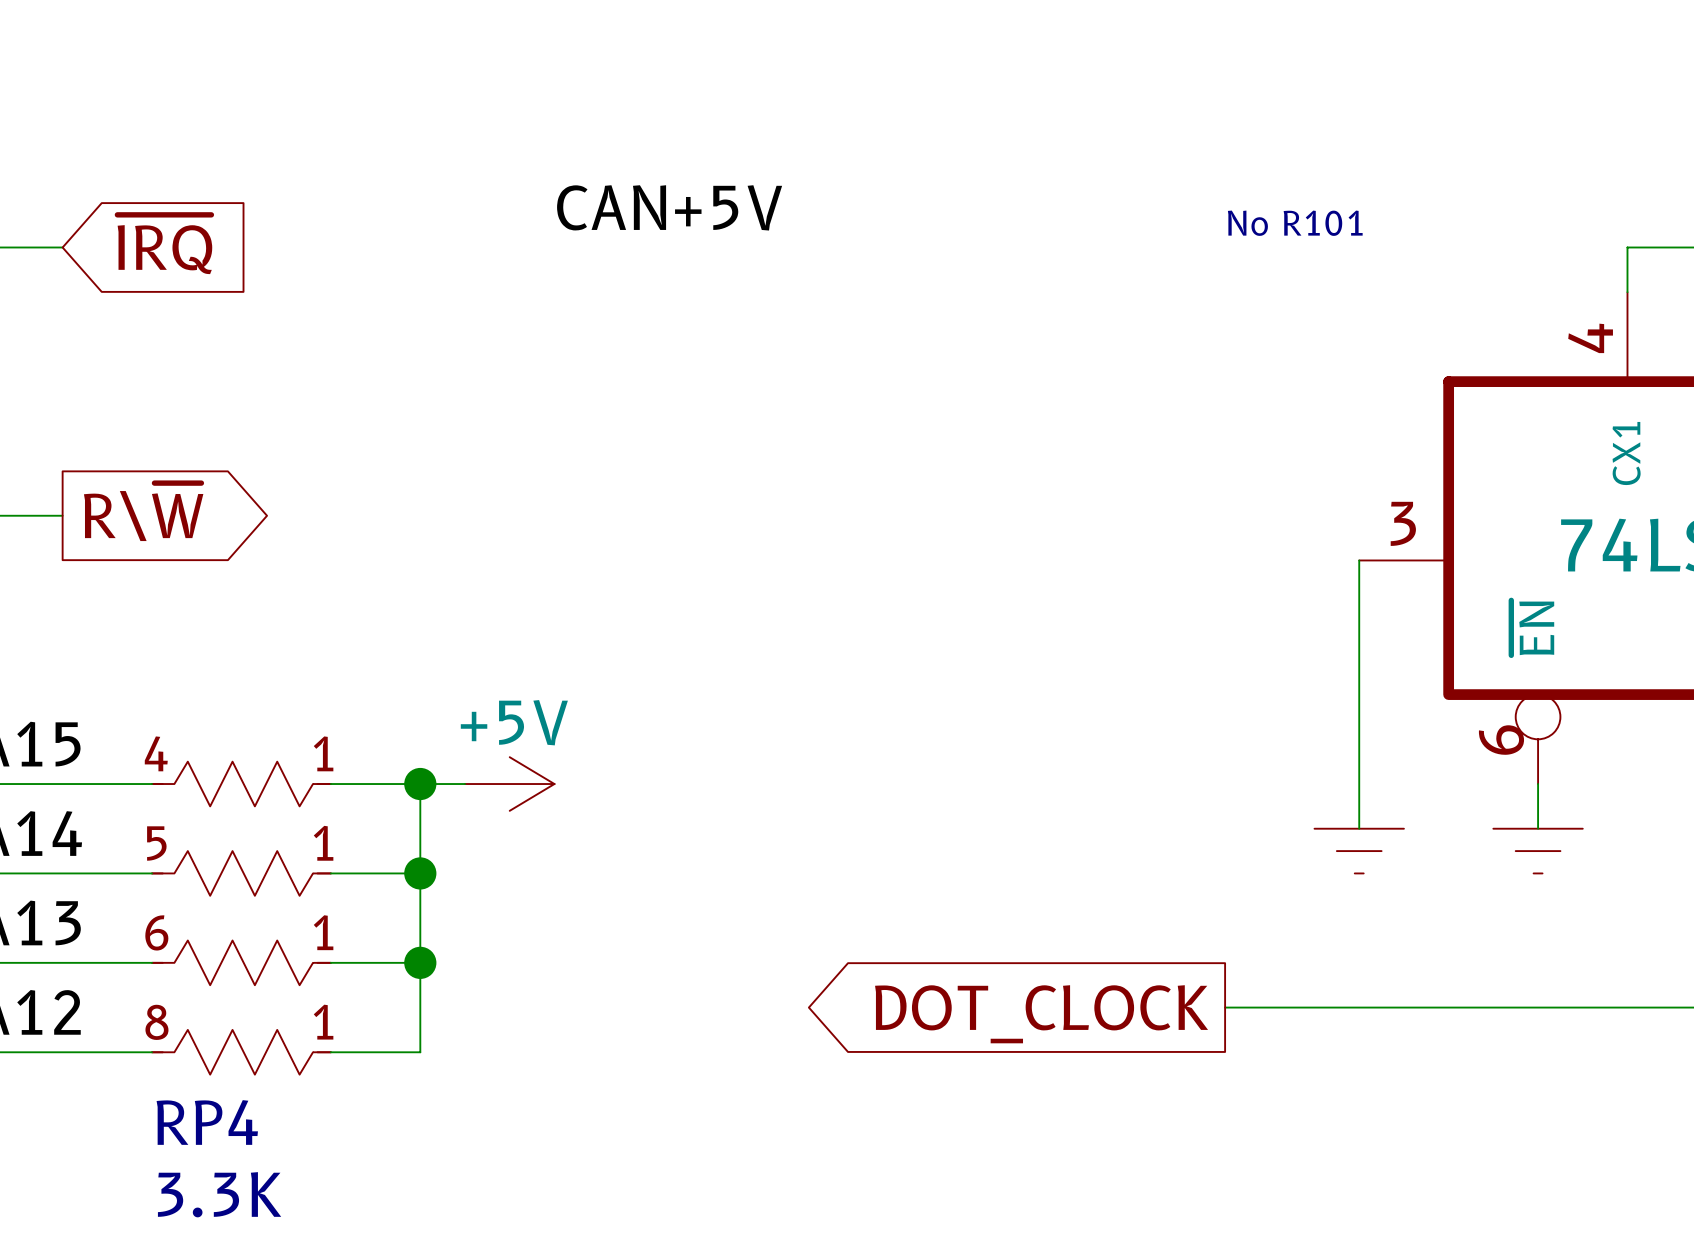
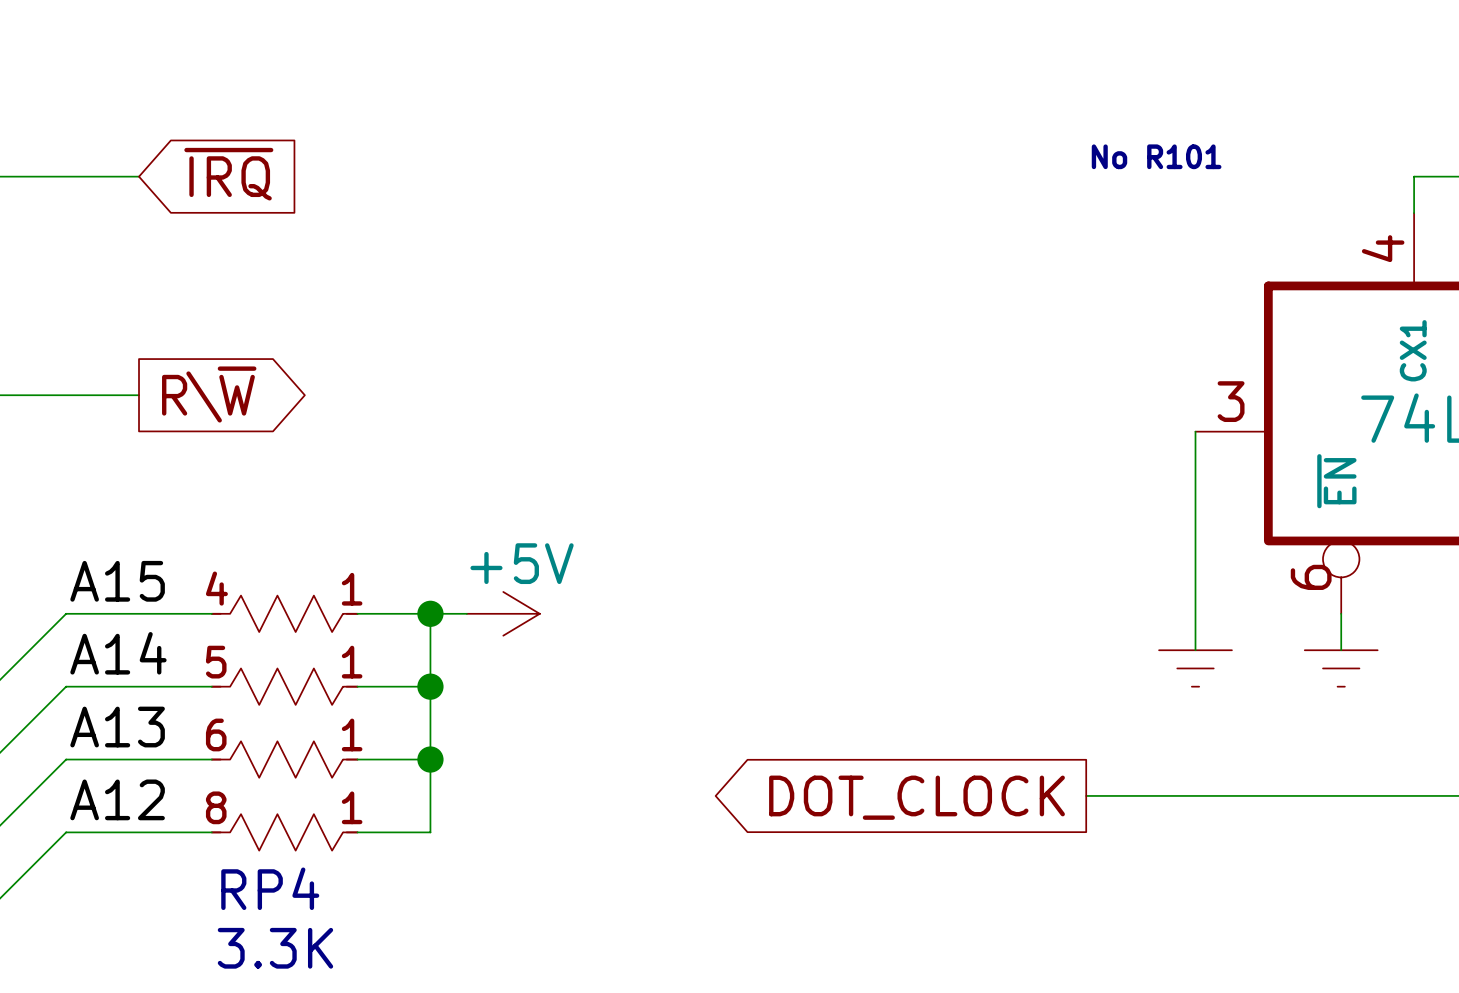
label: CAN+5V (669, 207) -> none

